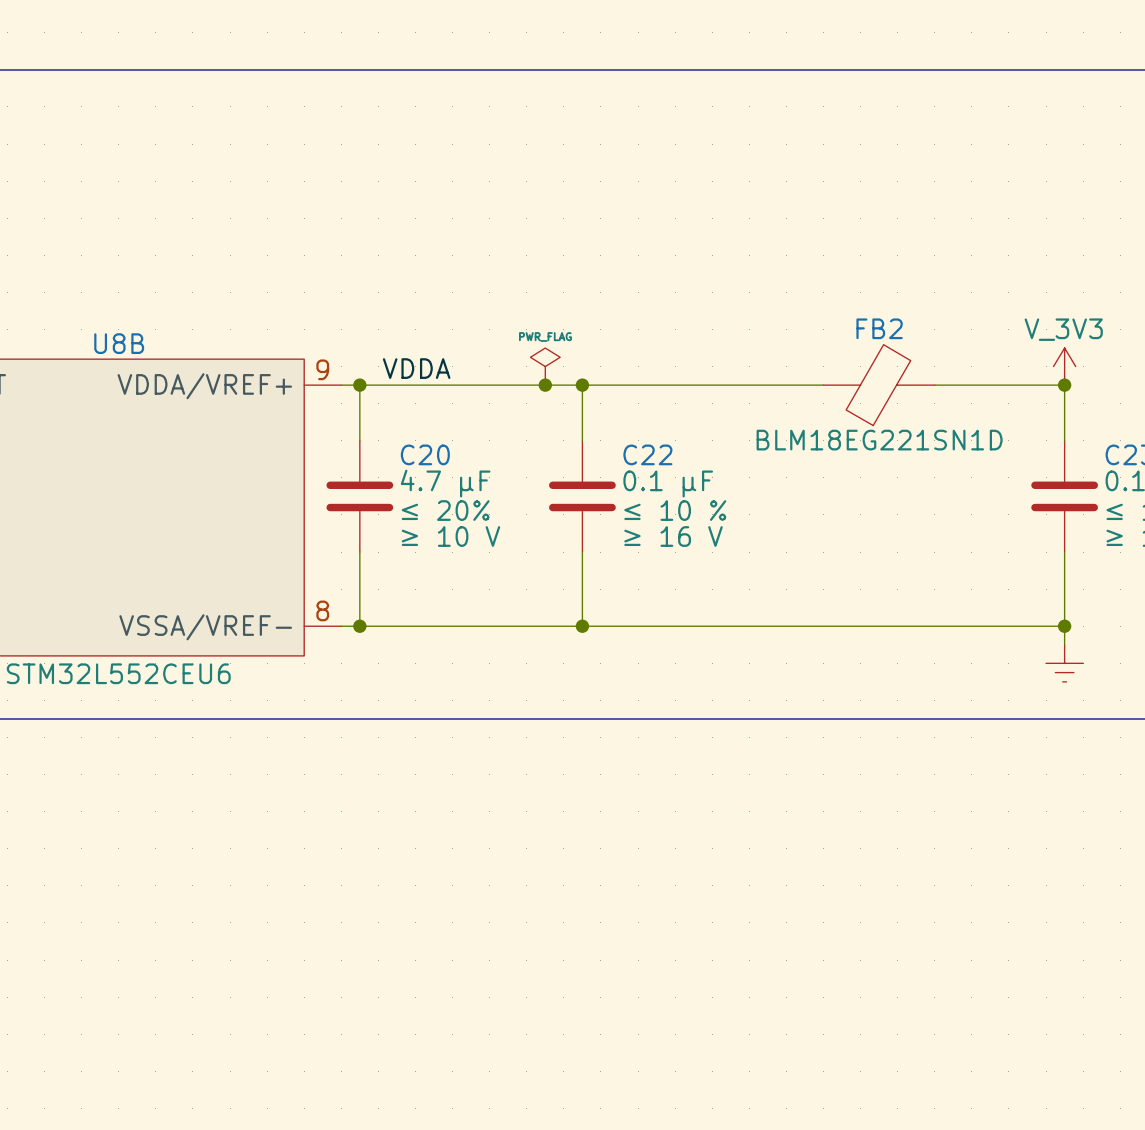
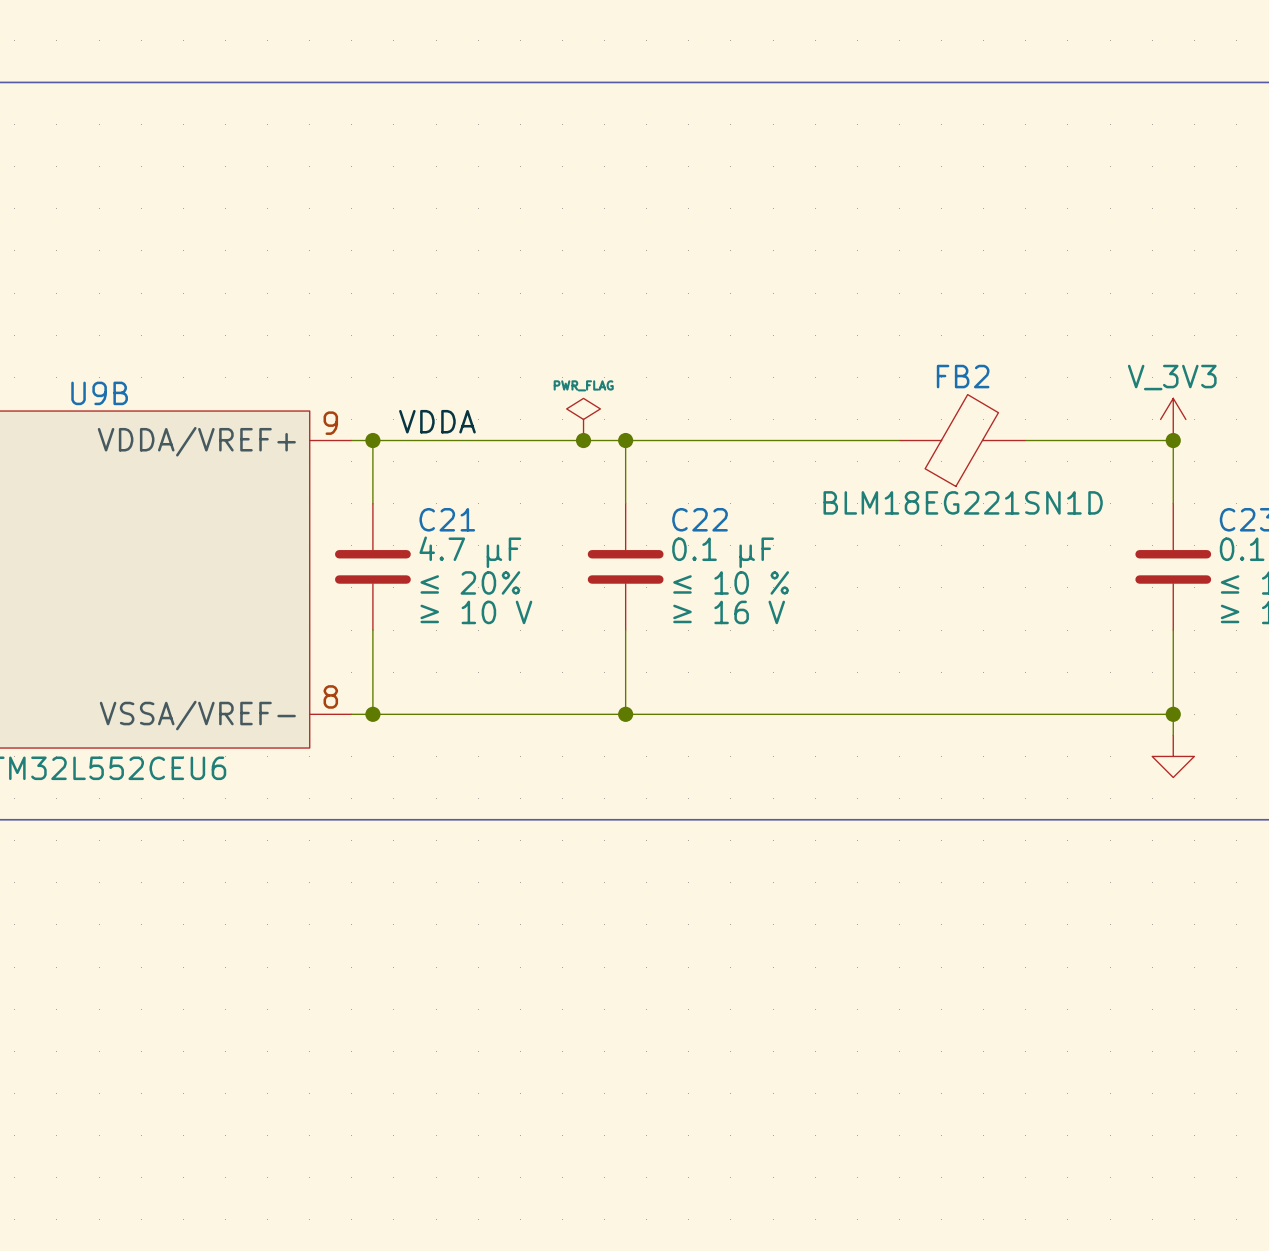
U8B name: U8B (119, 343) -> U9B (99, 393)
C20 name: C20 (425, 454) -> C21 (447, 519)
power symbol shape: [1046, 644, 1084, 682] -> [1152, 735, 1195, 778]

